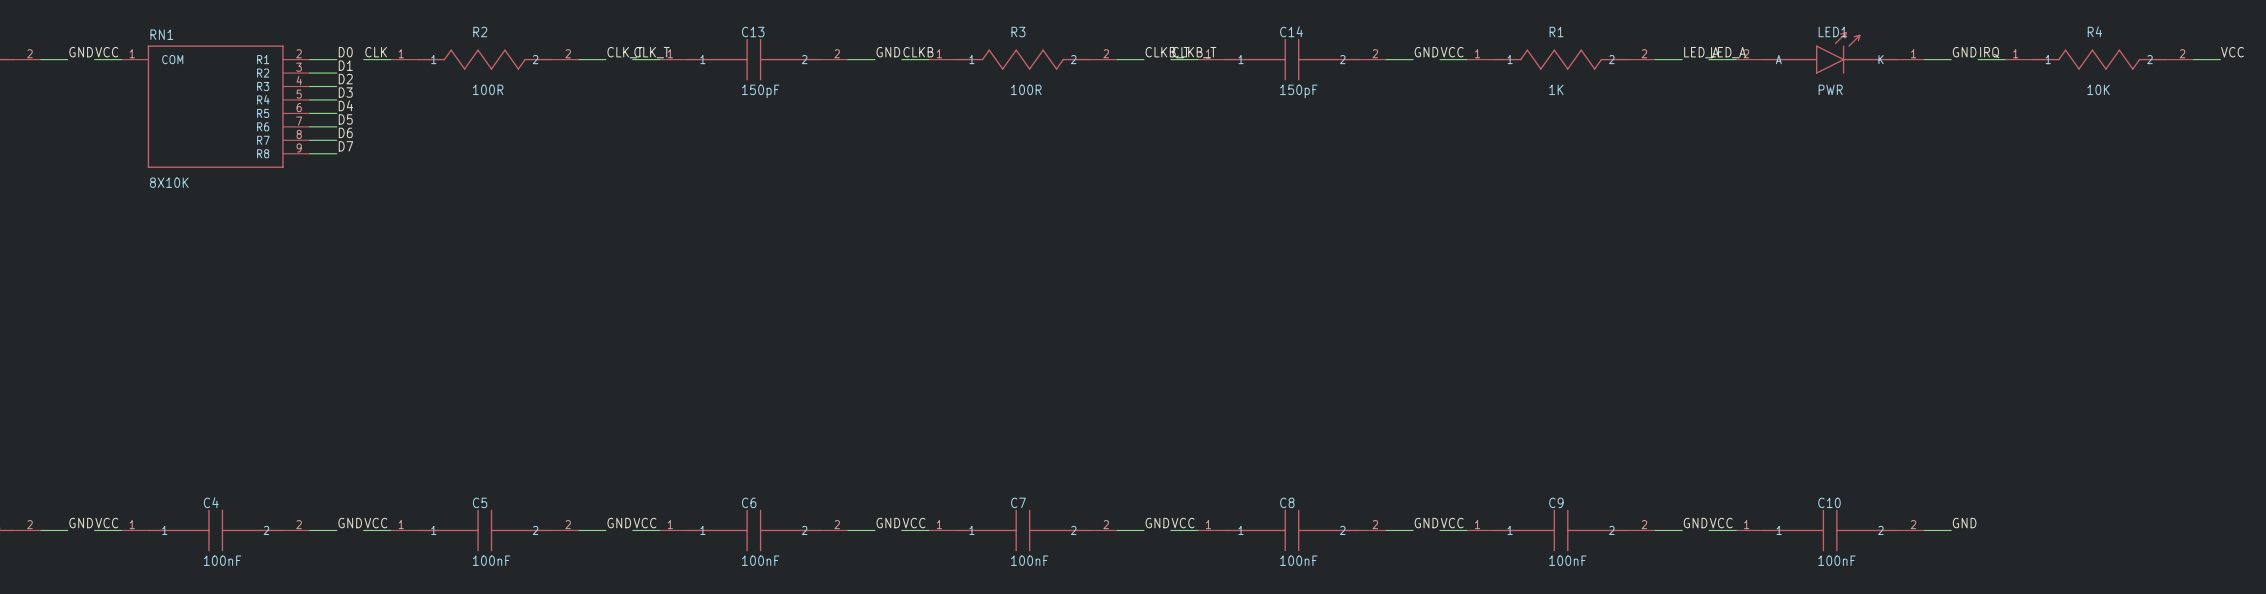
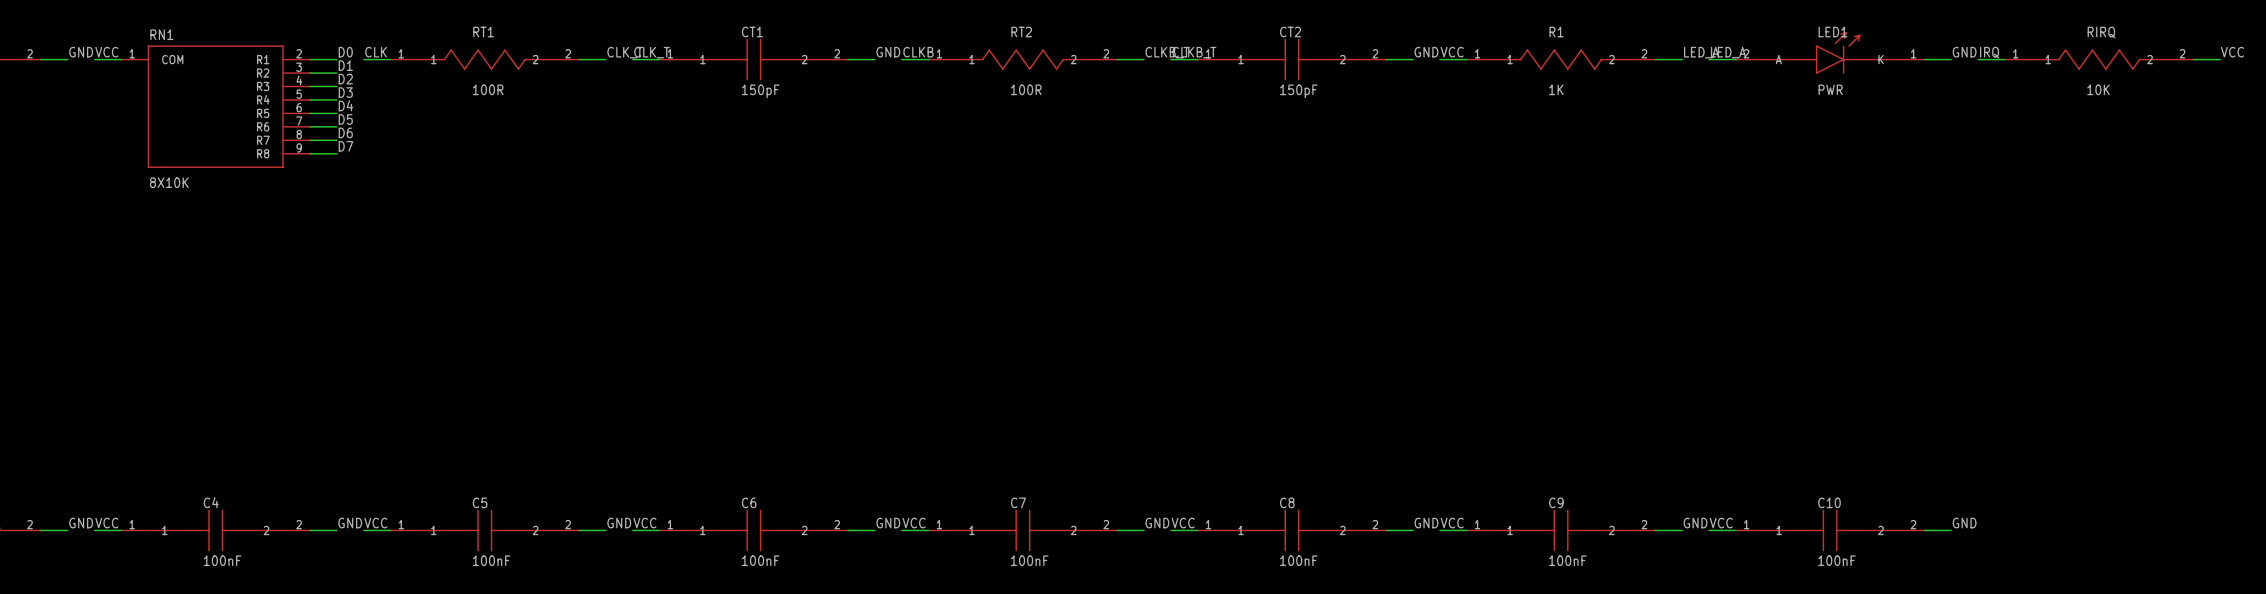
C14 name: C14 (1291, 31) -> CT2 (1290, 32)
R4 name: R4 (2094, 31) -> RIRQ (2101, 32)
R2 name: R2 (480, 32) -> RT1 (483, 32)
C13 name: C13 (753, 32) -> CT1 (752, 32)
R3 name: R3 (1018, 32) -> RT2 (1021, 32)

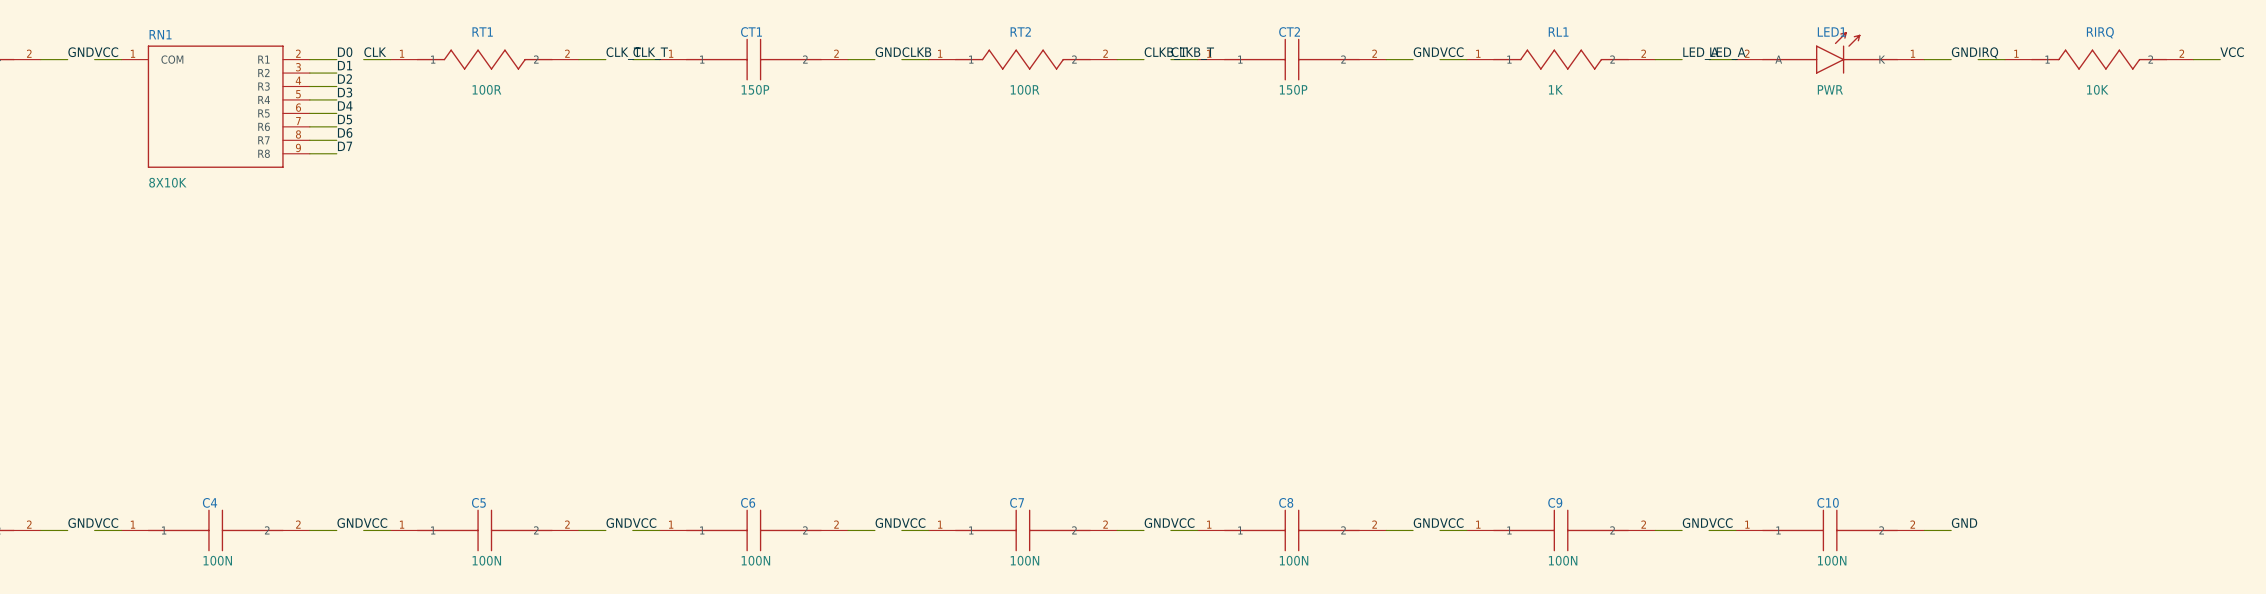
R1 name: R1 (1556, 32) -> RL1 (1558, 32)
CT1 value: 150pF (760, 91) -> 150P (755, 89)
CT2 value: 150pF (1298, 91) -> 150P (1293, 89)
C4 value: 100nF (222, 560) -> 100N (217, 560)
C5 value: 100nF (491, 560) -> 100N (486, 560)
C6 value: 100nF (760, 560) -> 100N (755, 560)
C7 value: 100nF (1029, 560) -> 100N (1024, 560)
C8 value: 100nF (1298, 560) -> 100N (1294, 560)
C9 value: 100nF (1567, 560) -> 100N (1563, 560)
C10 value: 100nF (1836, 560) -> 100N (1832, 560)

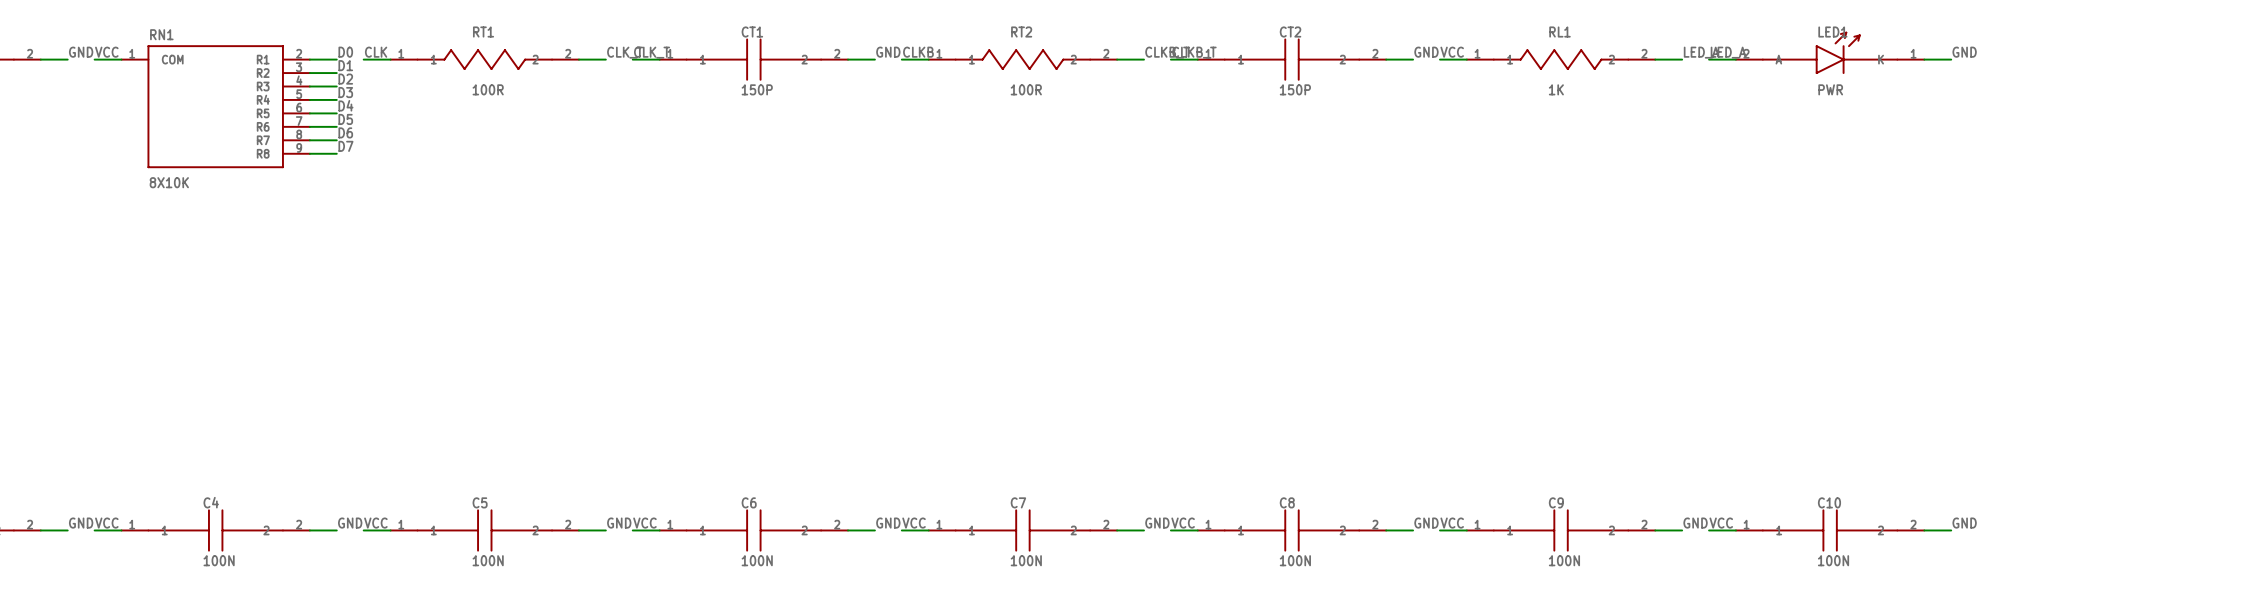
label: IRQ (1988, 52) -> none
label: VCC (2232, 52) -> none
wire: (1978, 59) (2005, 59) -> none
RIRQ: 10K (2099, 59) -> none
wire: (2193, 59) (2220, 59) -> none

